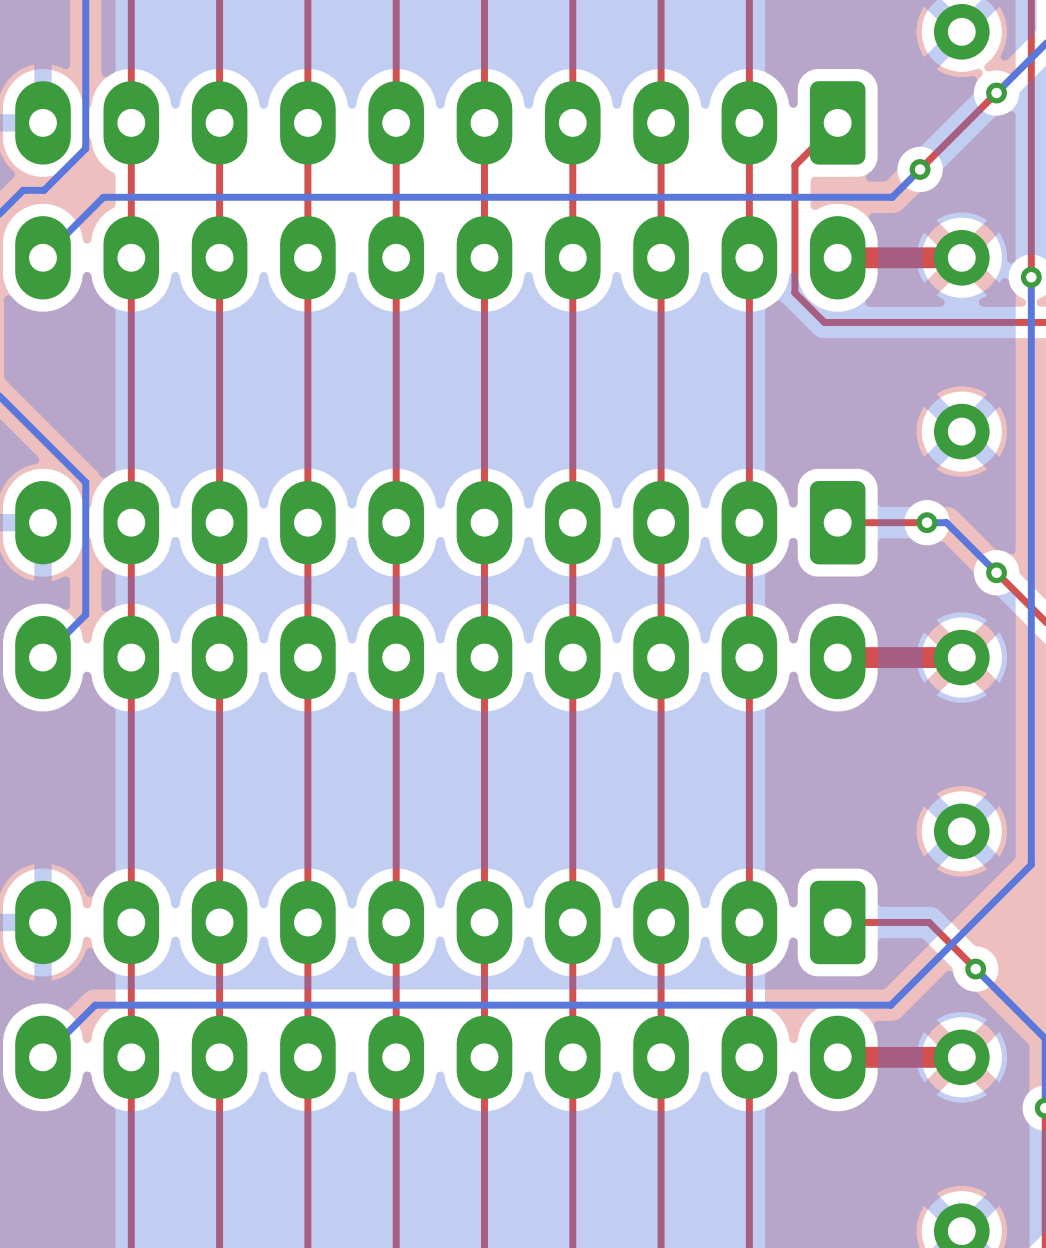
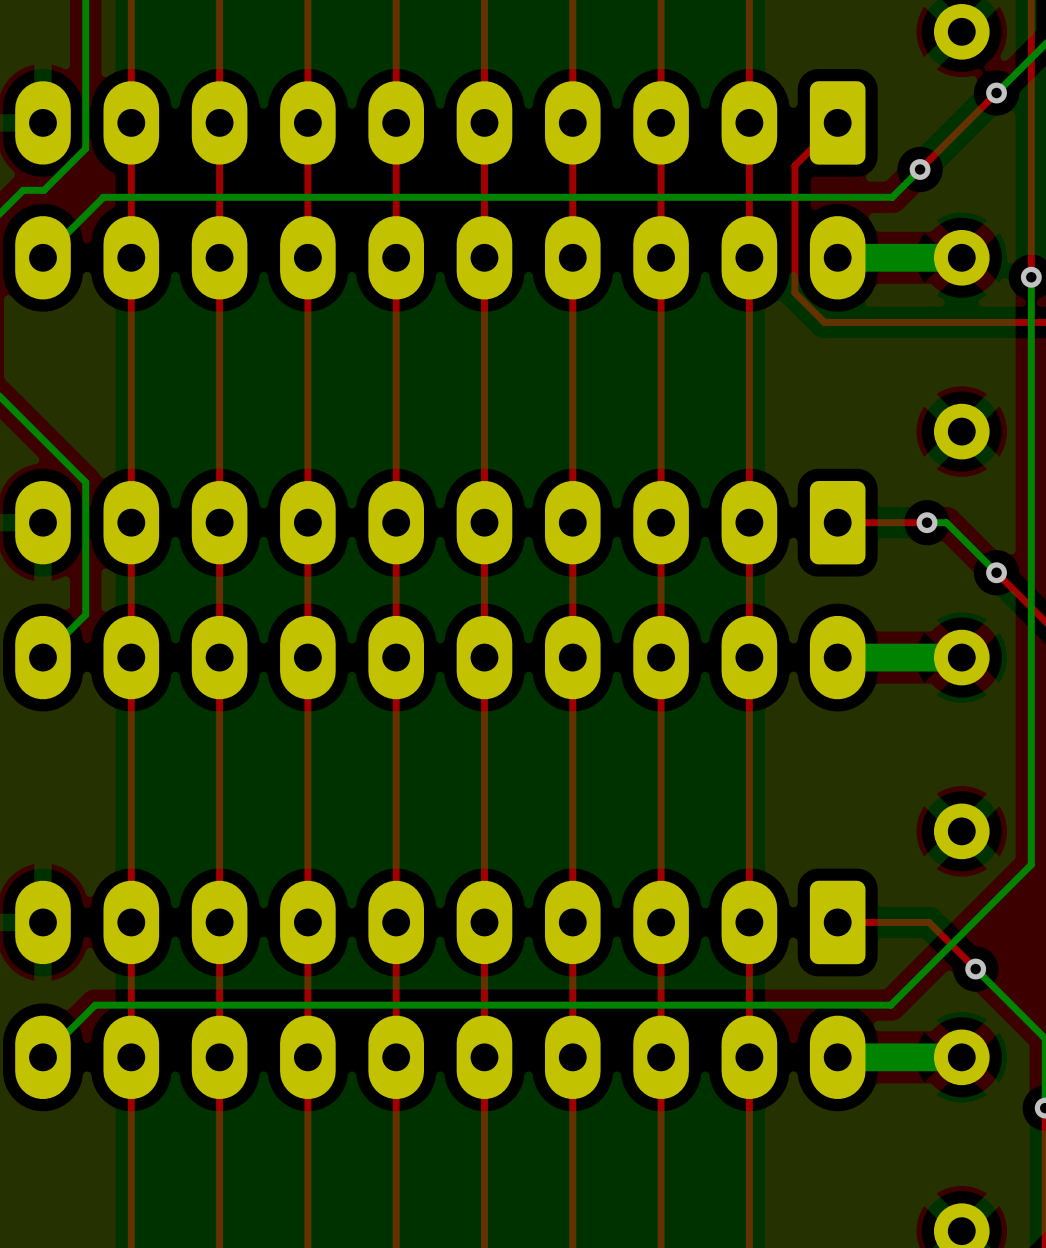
top track: (961, 257) (837, 257) -> none
bottom track: none -> (961, 257) (837, 257)
top track: (961, 657) (837, 657) -> none
bottom track: none -> (961, 657) (837, 657)
top track: (961, 1057) (837, 1057) -> none
bottom track: none -> (961, 1057) (837, 1057)

